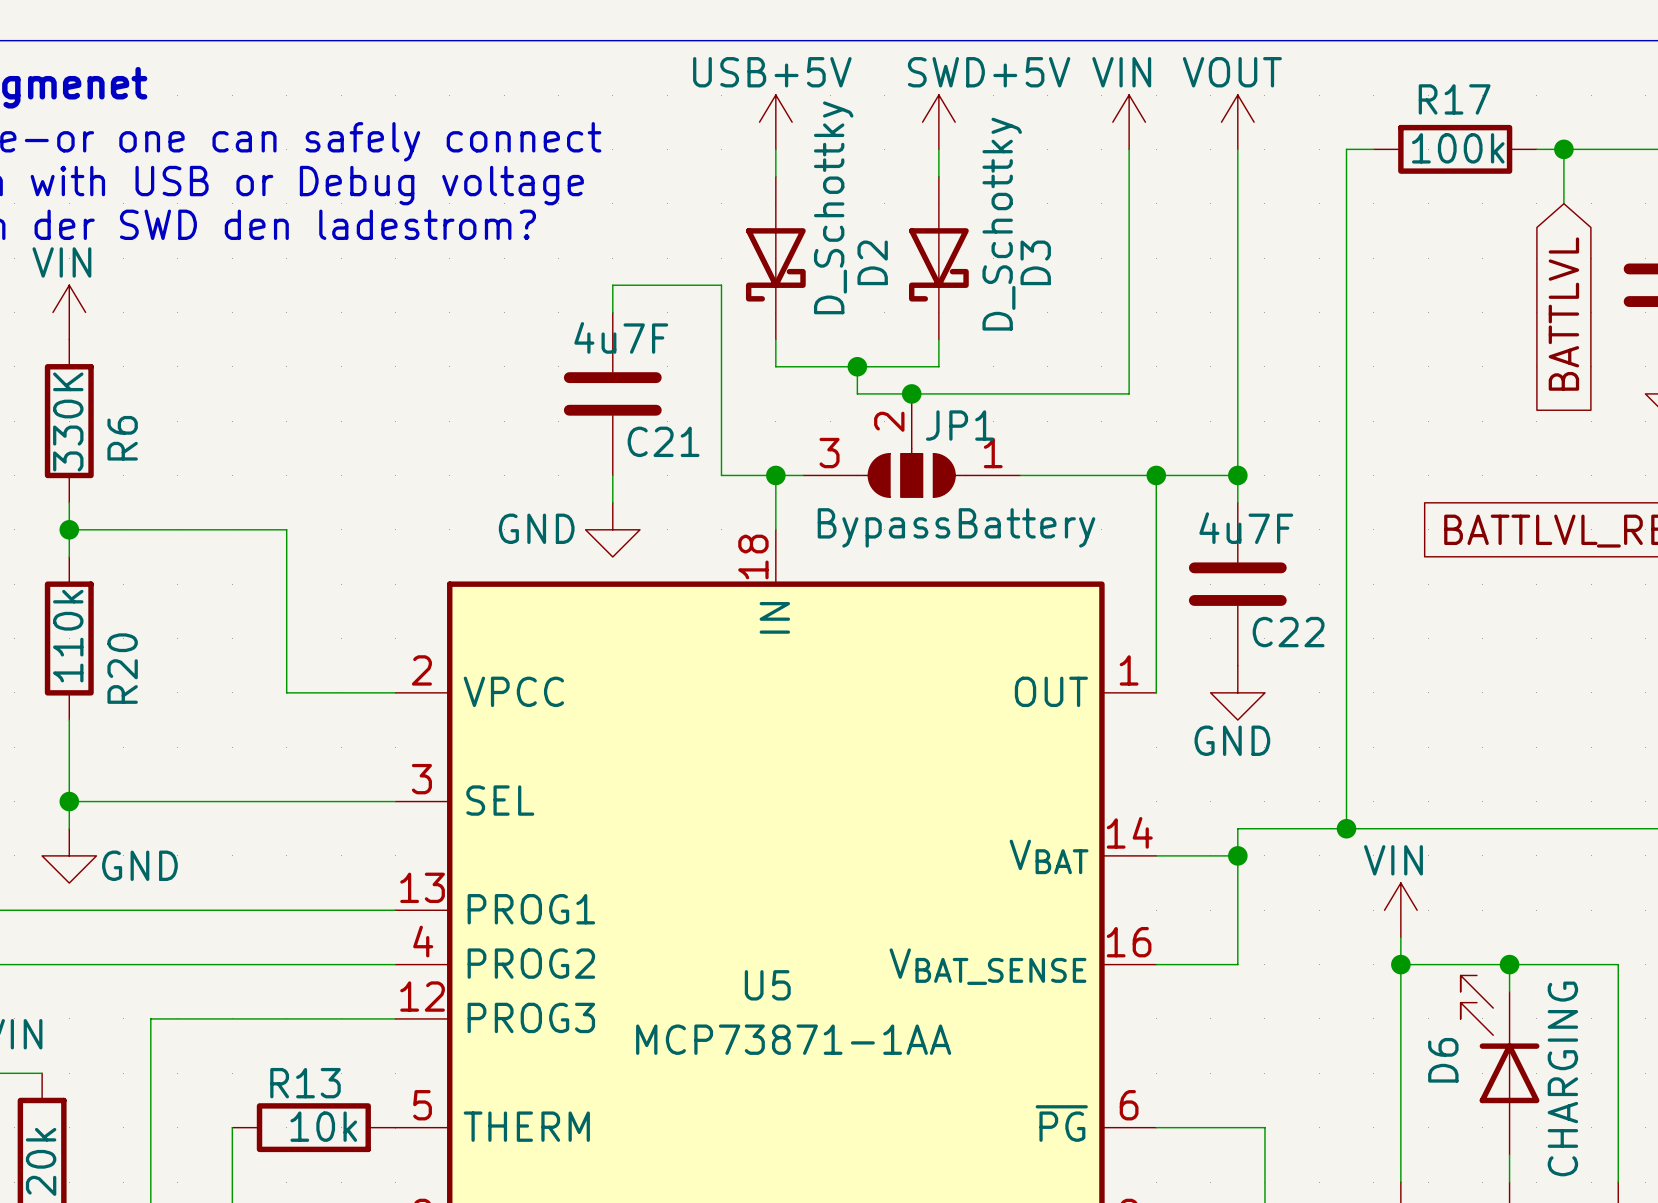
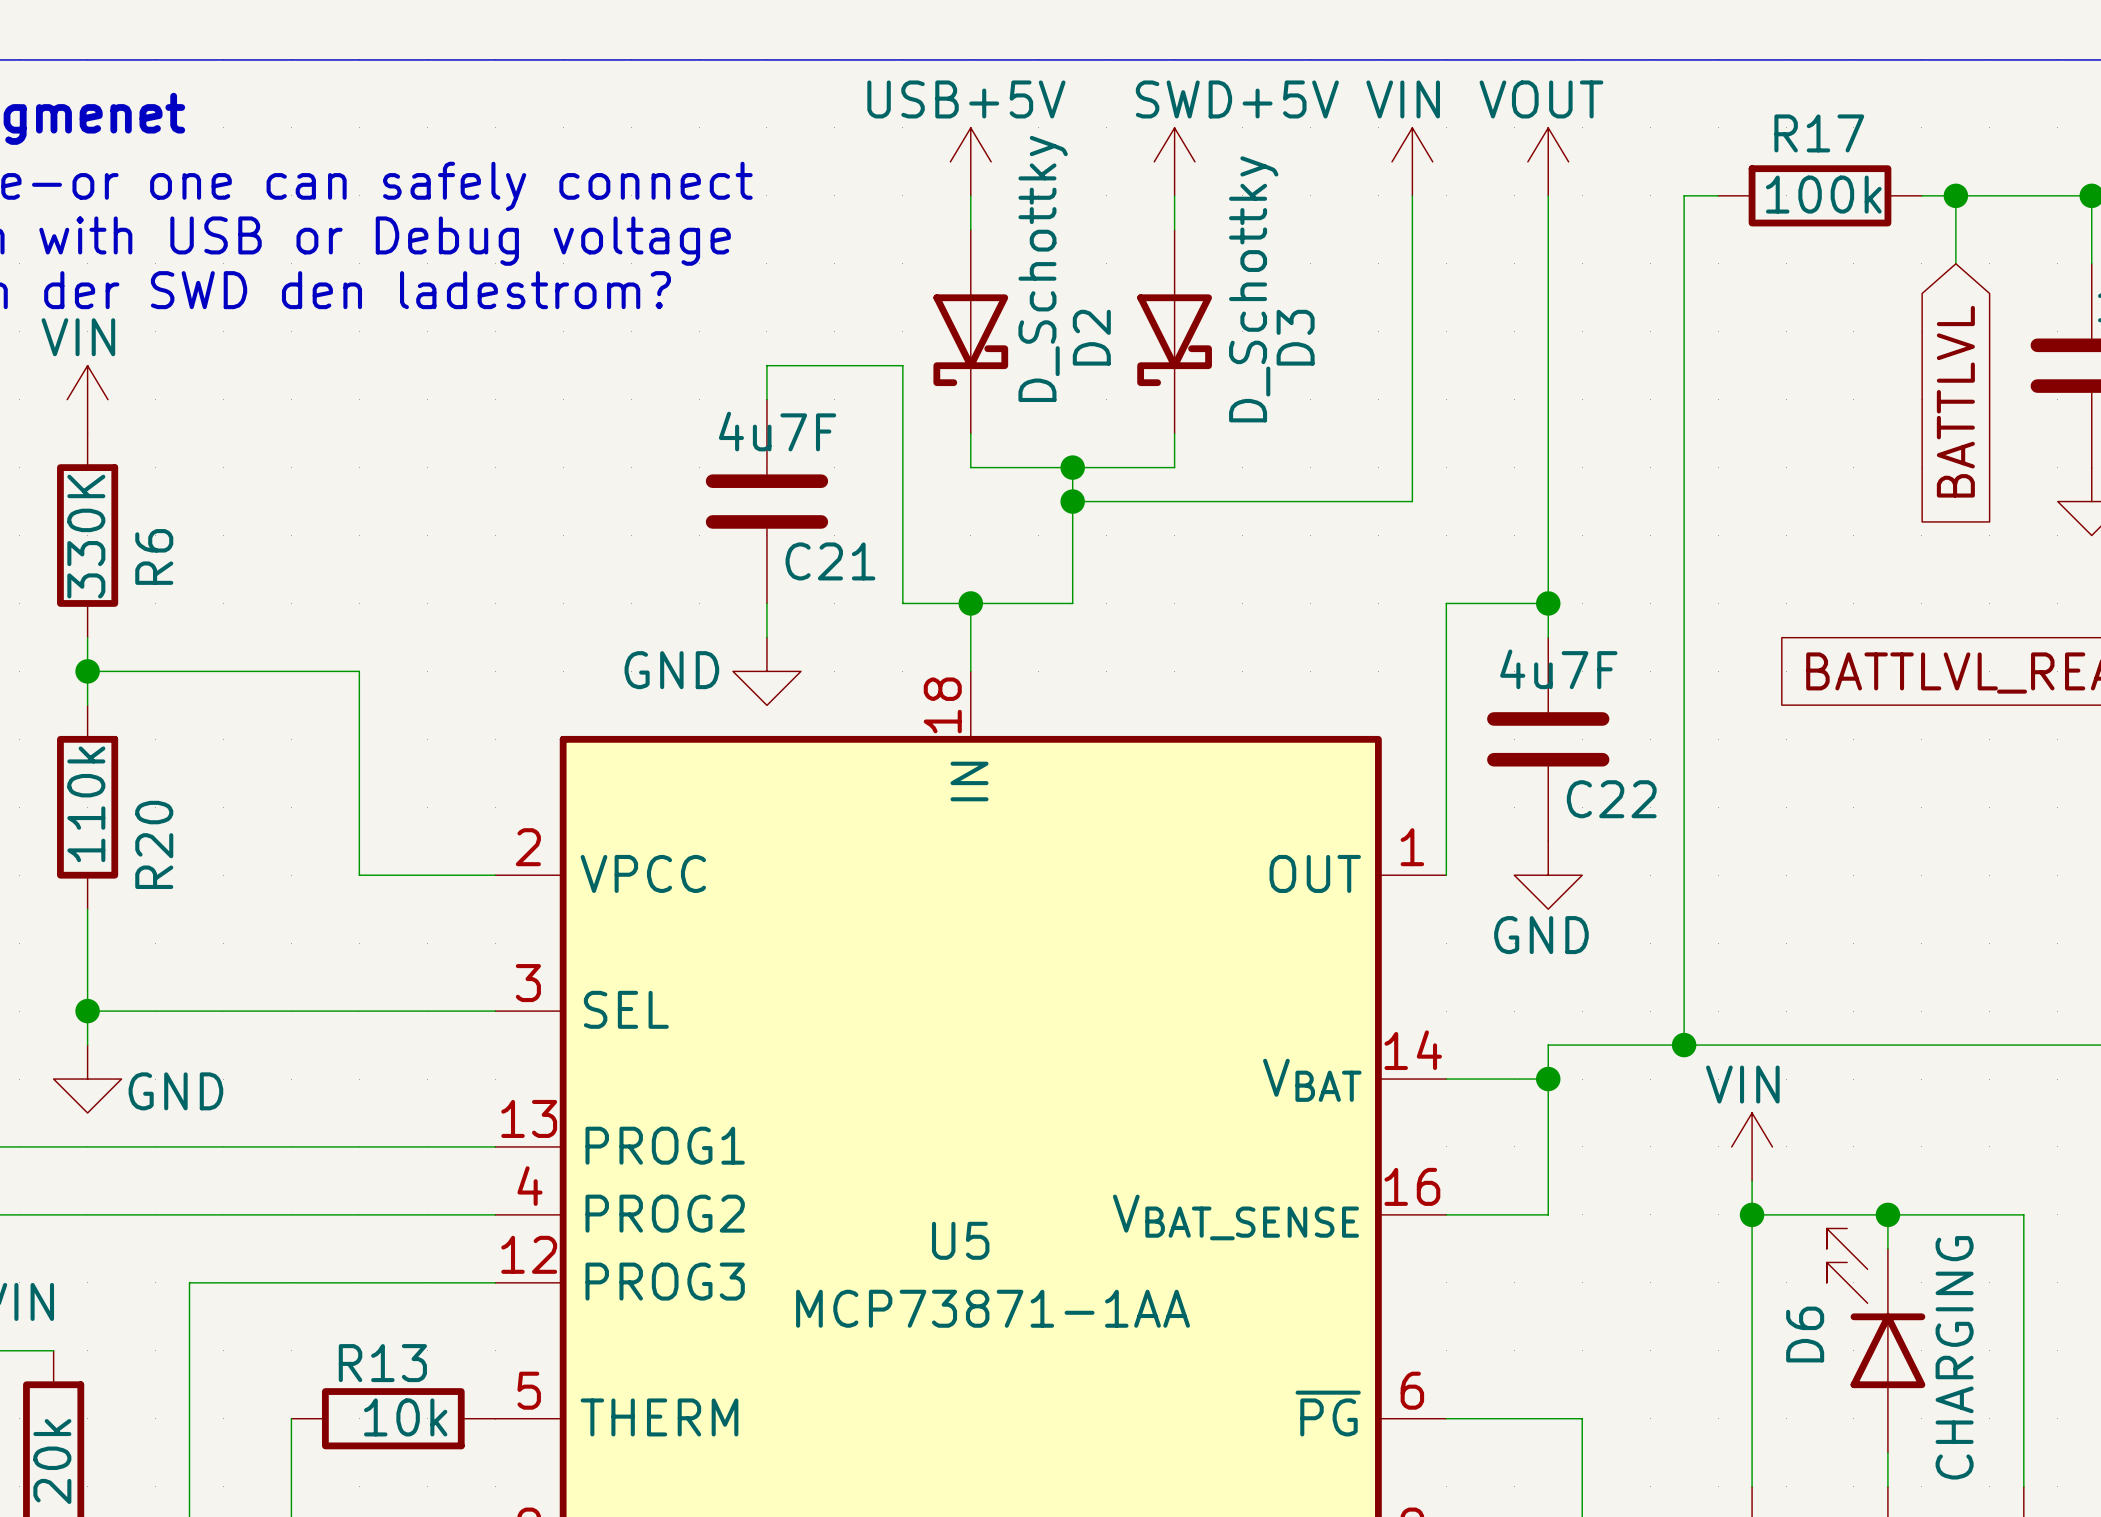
wire: none -> (1072, 501) (1072, 603) (1004, 603)
junction position: (911, 393) -> (1072, 501)
JP1: BypassBattery (911, 445) -> none
wire: (1020, 475) (1156, 475) -> none
junction: (1156, 475) -> none

